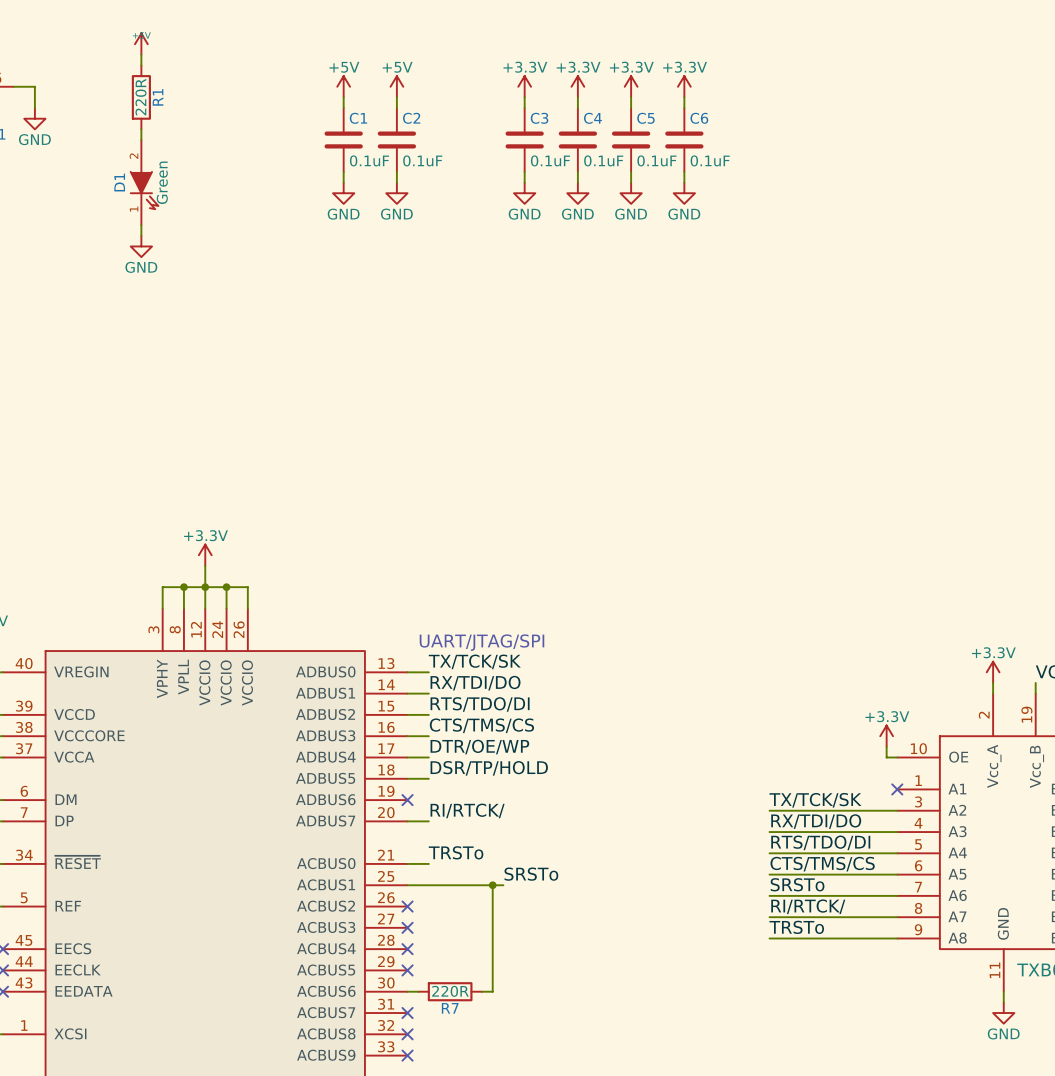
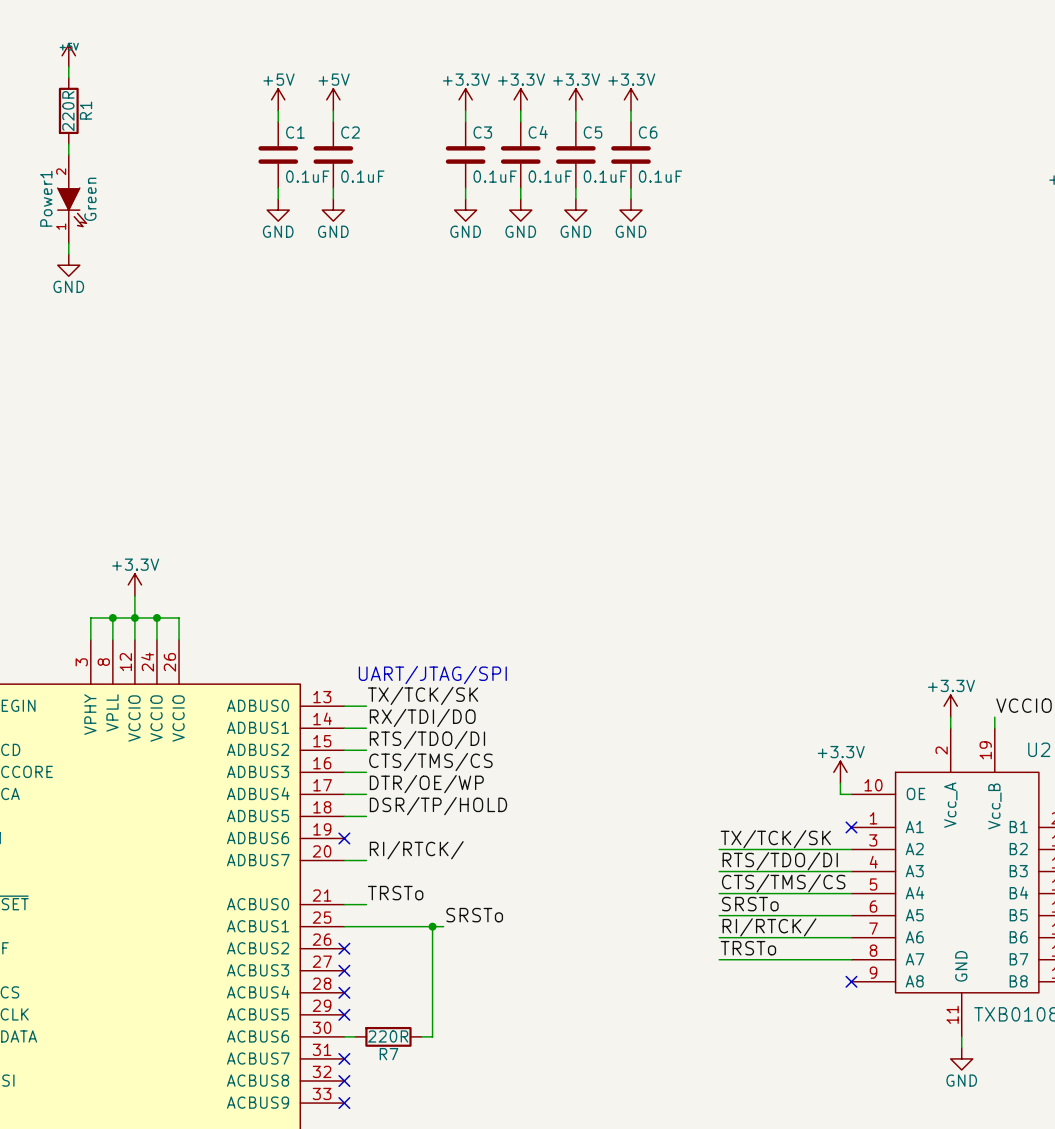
D1 name: D1 (119, 182) -> Power1 (46, 198)
label: RX/TDI/DO (816, 821) -> RTS/TDO/DI (780, 861)
label: RTS/TDO/DI (820, 842) -> CTS/TMS/CS (783, 883)
label: CTS/TMS/CS (822, 864) -> SRSTo (750, 904)
label: SRSTo (797, 884) -> RI/RTCK/ (769, 927)
label: RI/RTCK/ (808, 906) -> TRSTo (748, 948)
label: TRSTo (796, 927) -> none
wire: (769, 938) (897, 938) -> none
no-connect mark: none -> (851, 981)

